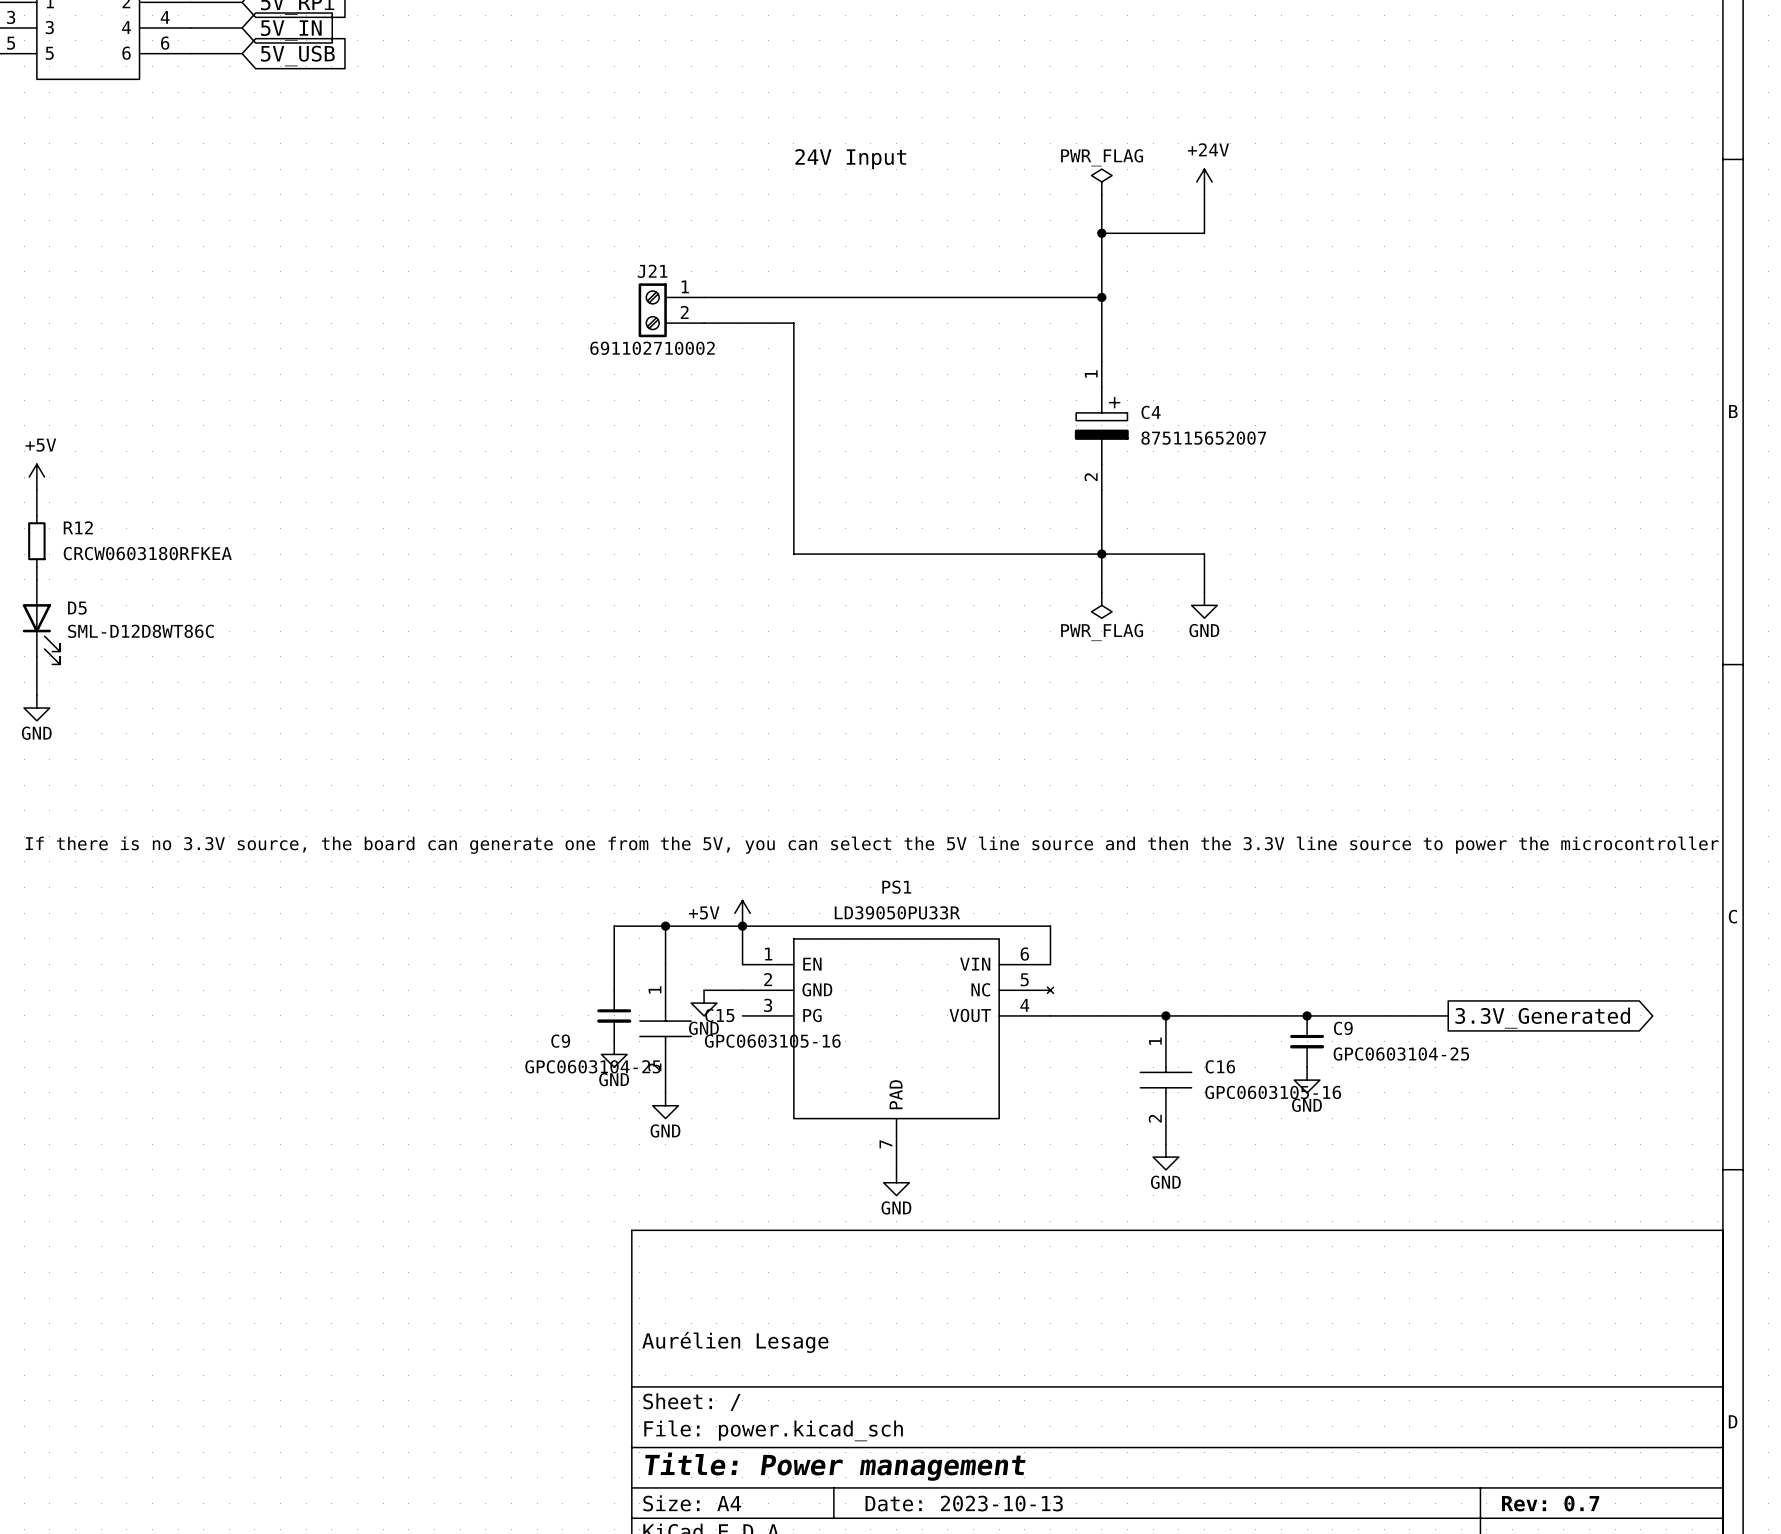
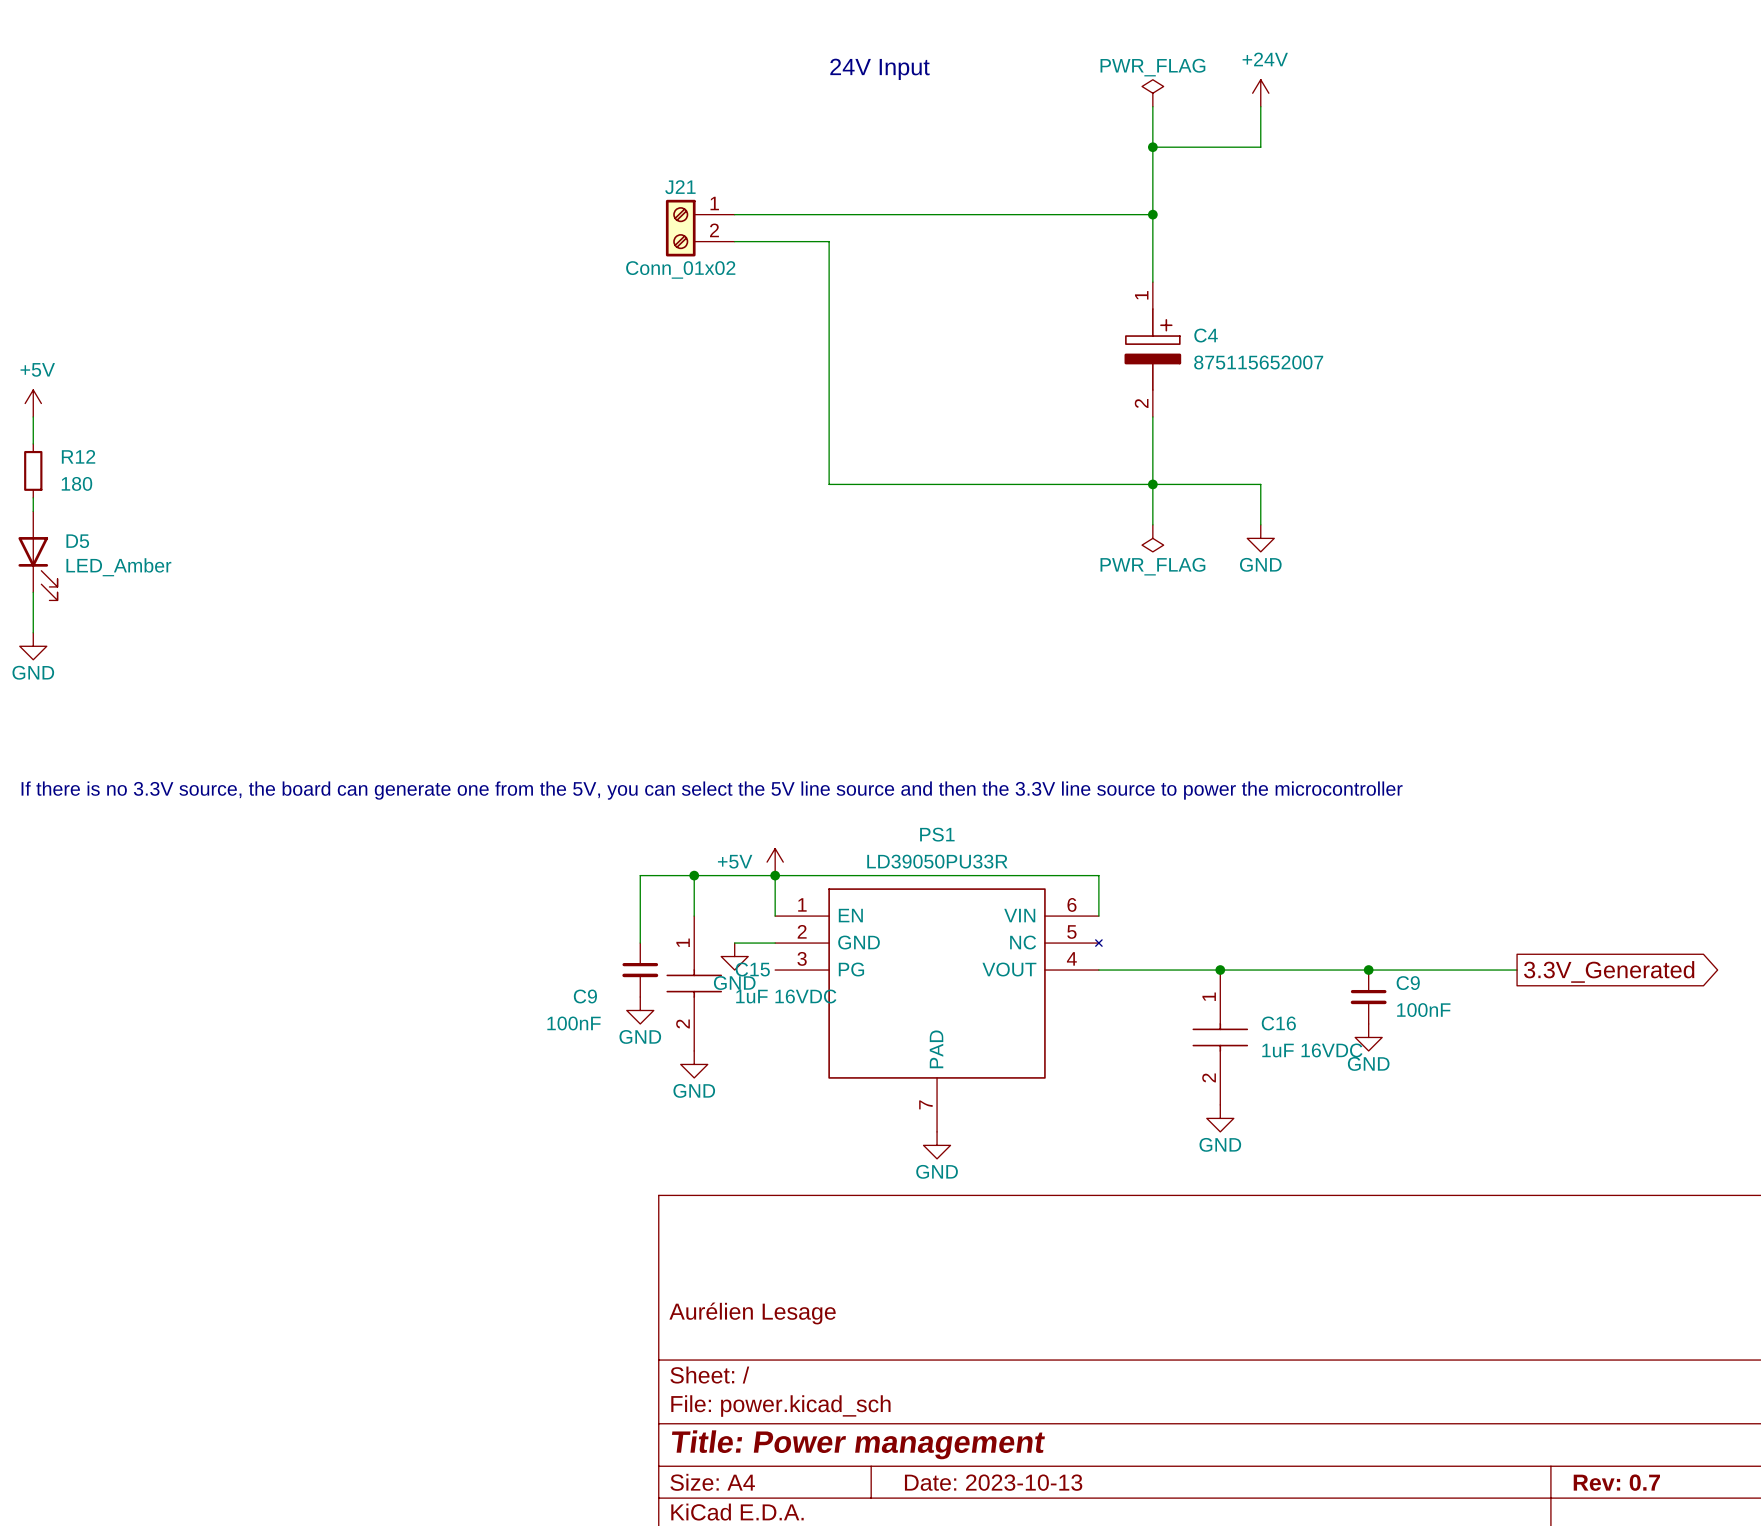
J21 value: 691102710002 (652, 348) -> Conn_01x02 (680, 269)
R12 value: CRCW0603180RFKEA (147, 553) -> 180 (76, 483)
D5 value: SML-D12D8WT86C (140, 631) -> LED_Amber (118, 567)
C15 value: GPC0603105-16 (772, 1041) -> 1uF 16VDC (786, 996)
C9 value: GPC0603104-25 (1401, 1054) -> 100nF (1423, 1010)
C9 value: GPC0603104-25 (593, 1066) -> 100nF (574, 1023)
C16 value: GPC0603105-16 (1273, 1092) -> 1uF 16VDC (1312, 1050)

